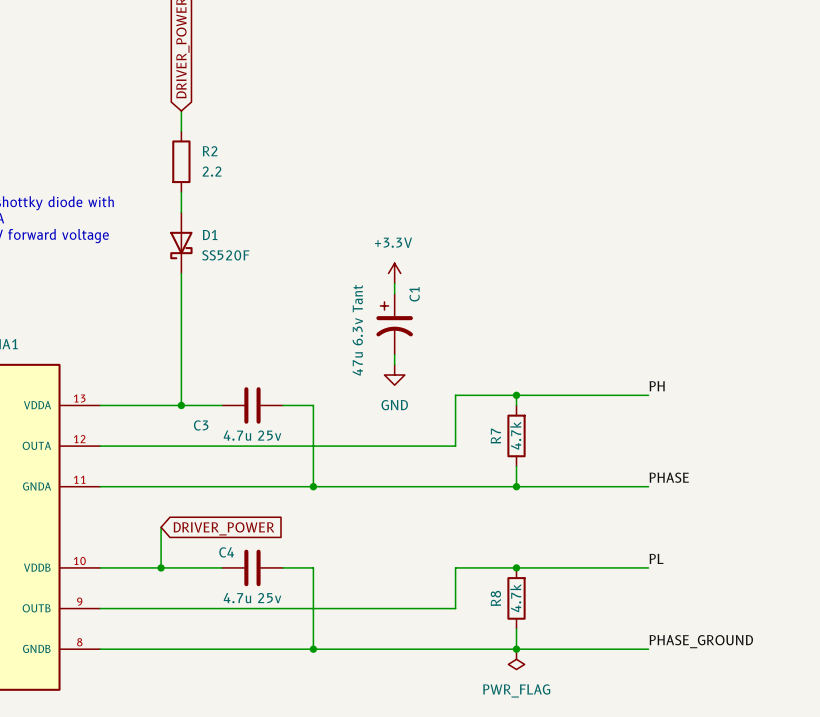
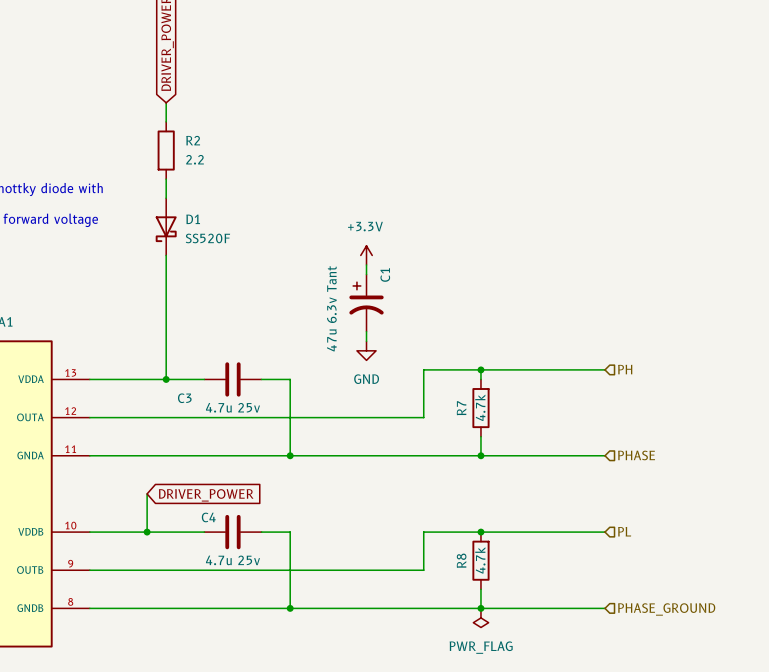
label: PH (657, 386) -> none
hierarchical label: none -> PH (625, 369)
label: PHASE (669, 477) -> none
hierarchical label: none -> PHASE (636, 455)
label: PL (656, 558) -> none
hierarchical label: none -> PL (624, 531)
label: PHASE_GROUND (701, 641) -> none
hierarchical label: none -> PHASE_GROUND (666, 609)

